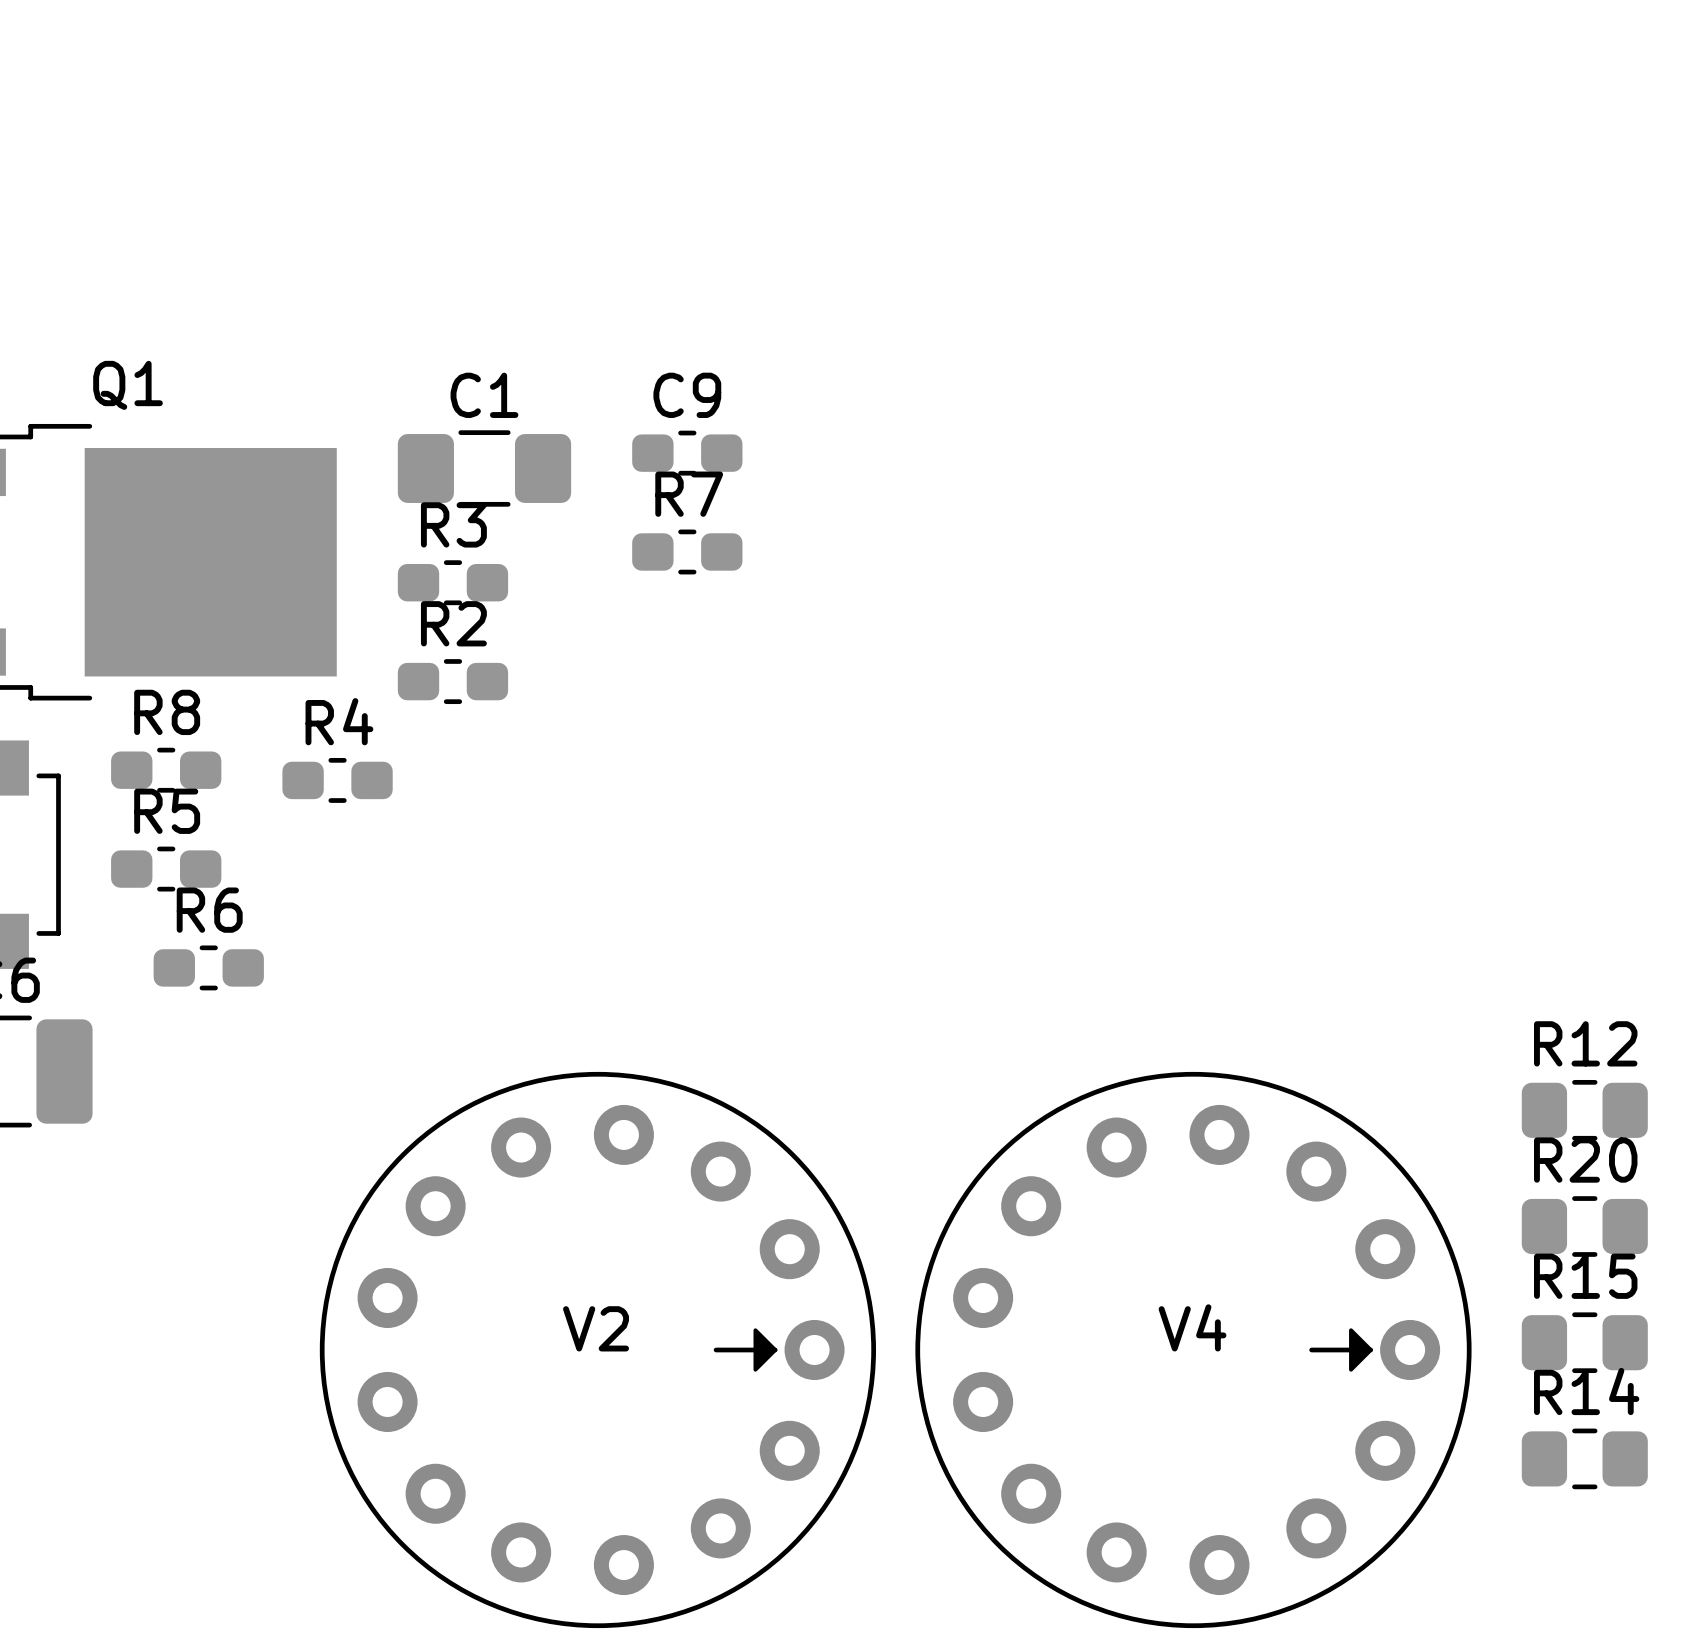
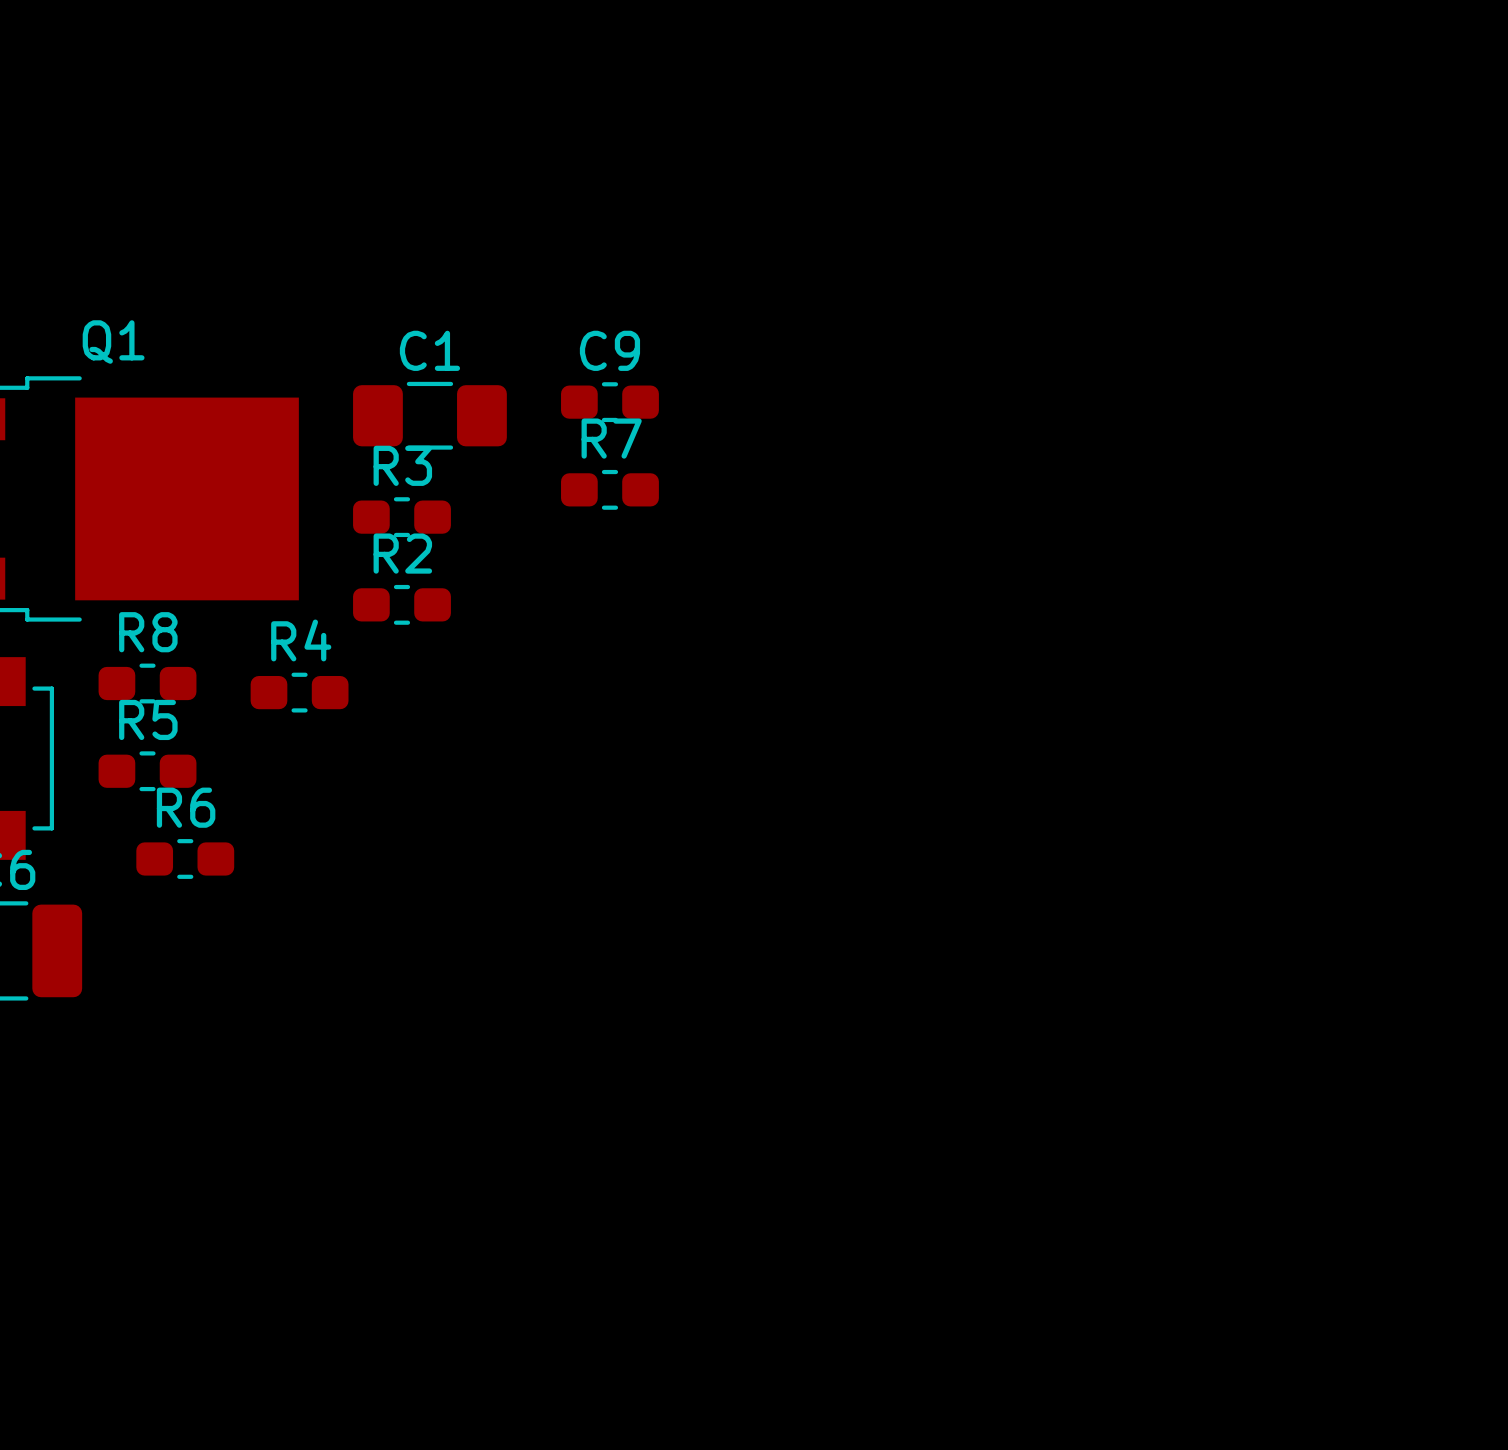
R12: (1584, 1110) -> none
R20: (1584, 1226) -> none
R15: (1584, 1342) -> none
V2: (597, 1349) -> none
V4: (1193, 1349) -> none
R14: (1584, 1458) -> none

